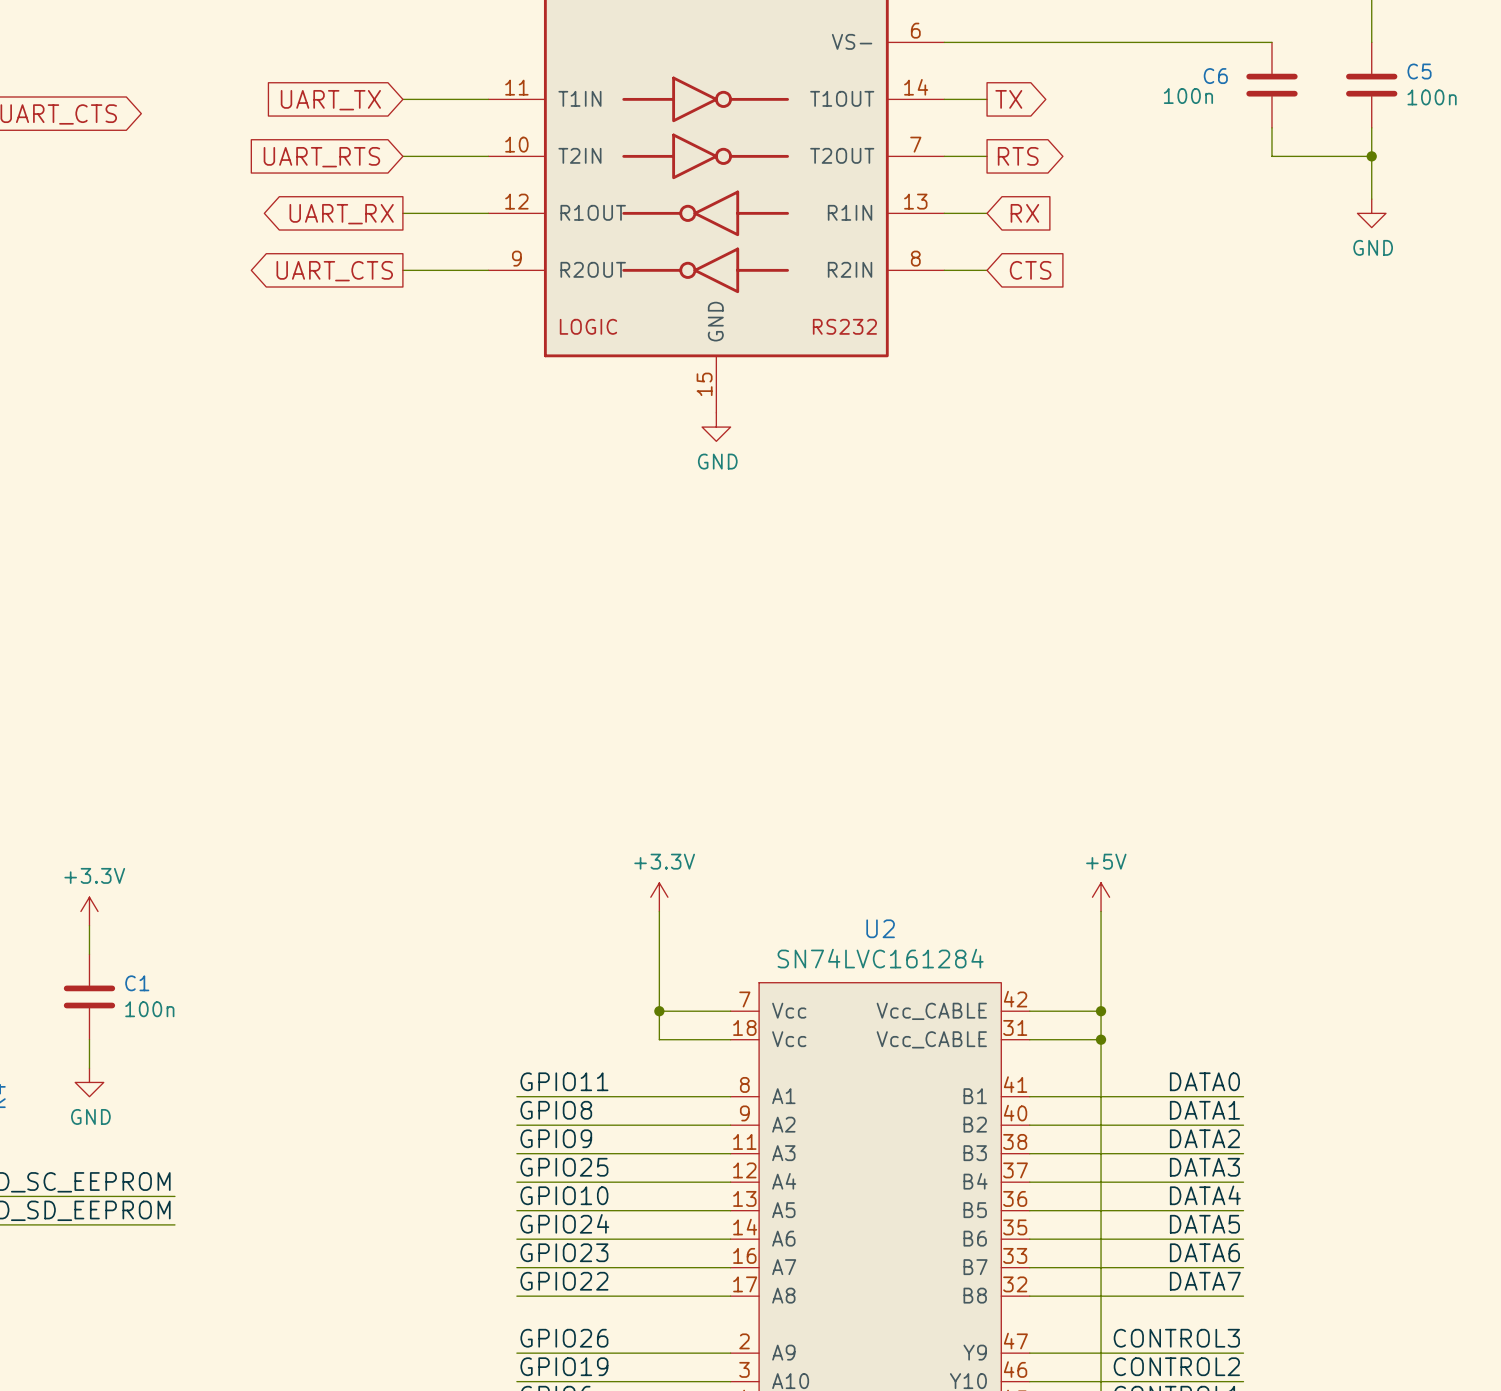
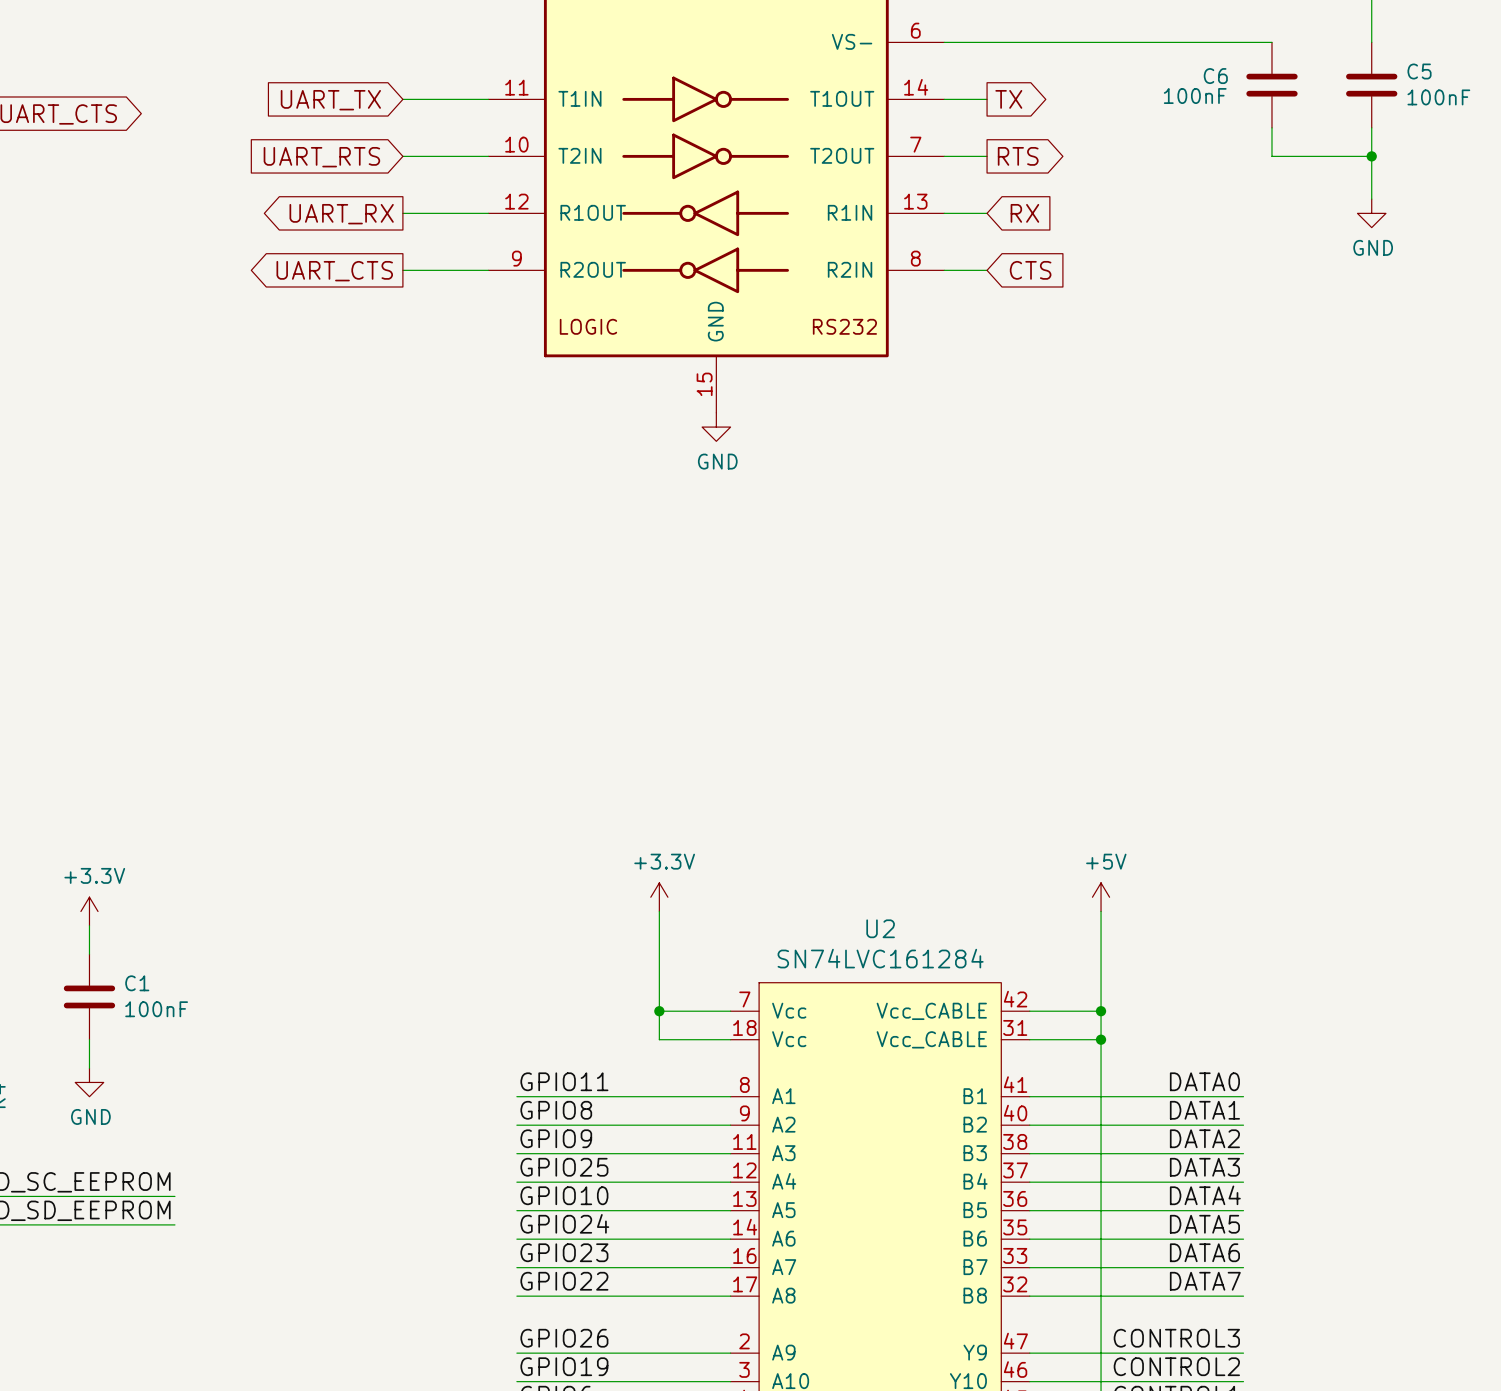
C6 value: 100n (1188, 96) -> 100nF (1195, 96)
C5 value: 100n (1432, 97) -> 100nF (1438, 97)
C1 value: 100n (149, 1009) -> 100nF (156, 1009)

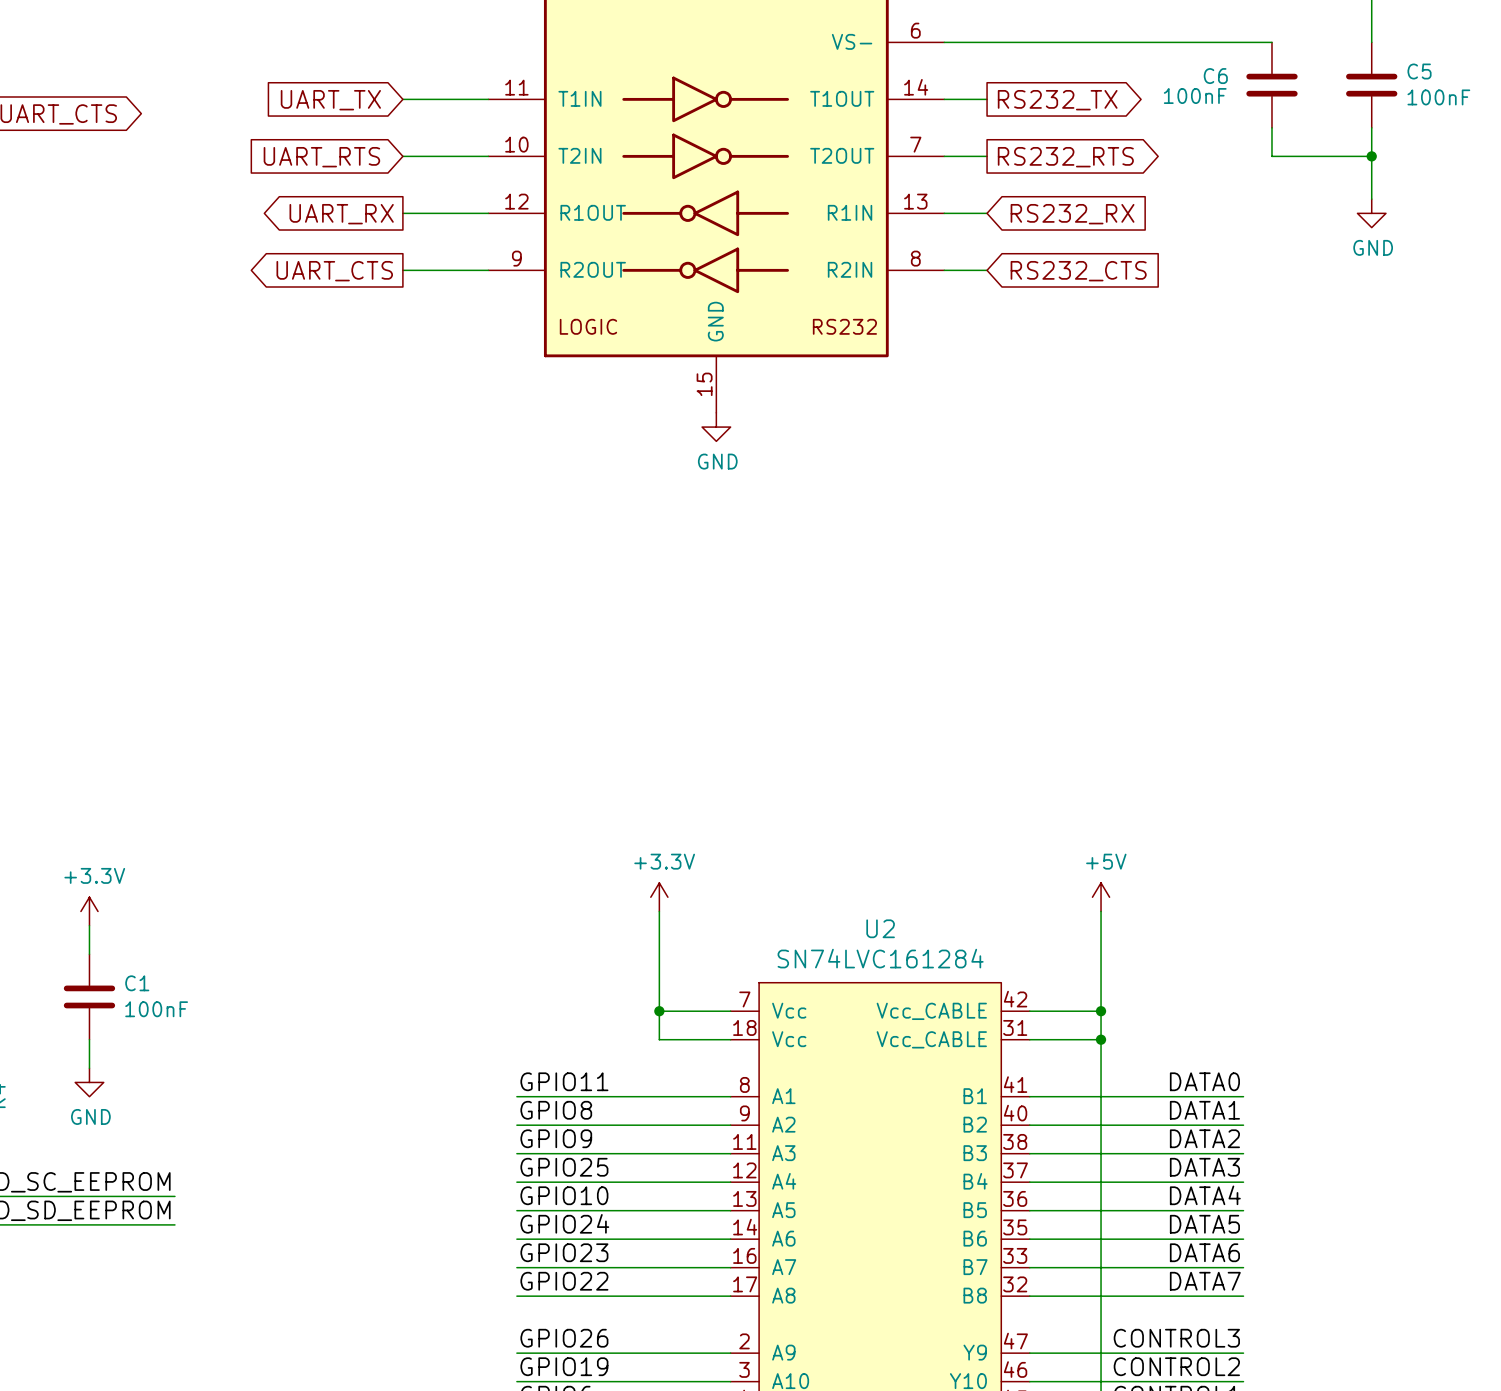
global label: TX (1008, 99) -> RS232_TX (1057, 100)
global label: RTS (1018, 156) -> RS232_RTS (1065, 157)
global label: RX (1024, 213) -> RS232_RX (1072, 214)
global label: CTS (1030, 270) -> RS232_CTS (1078, 271)

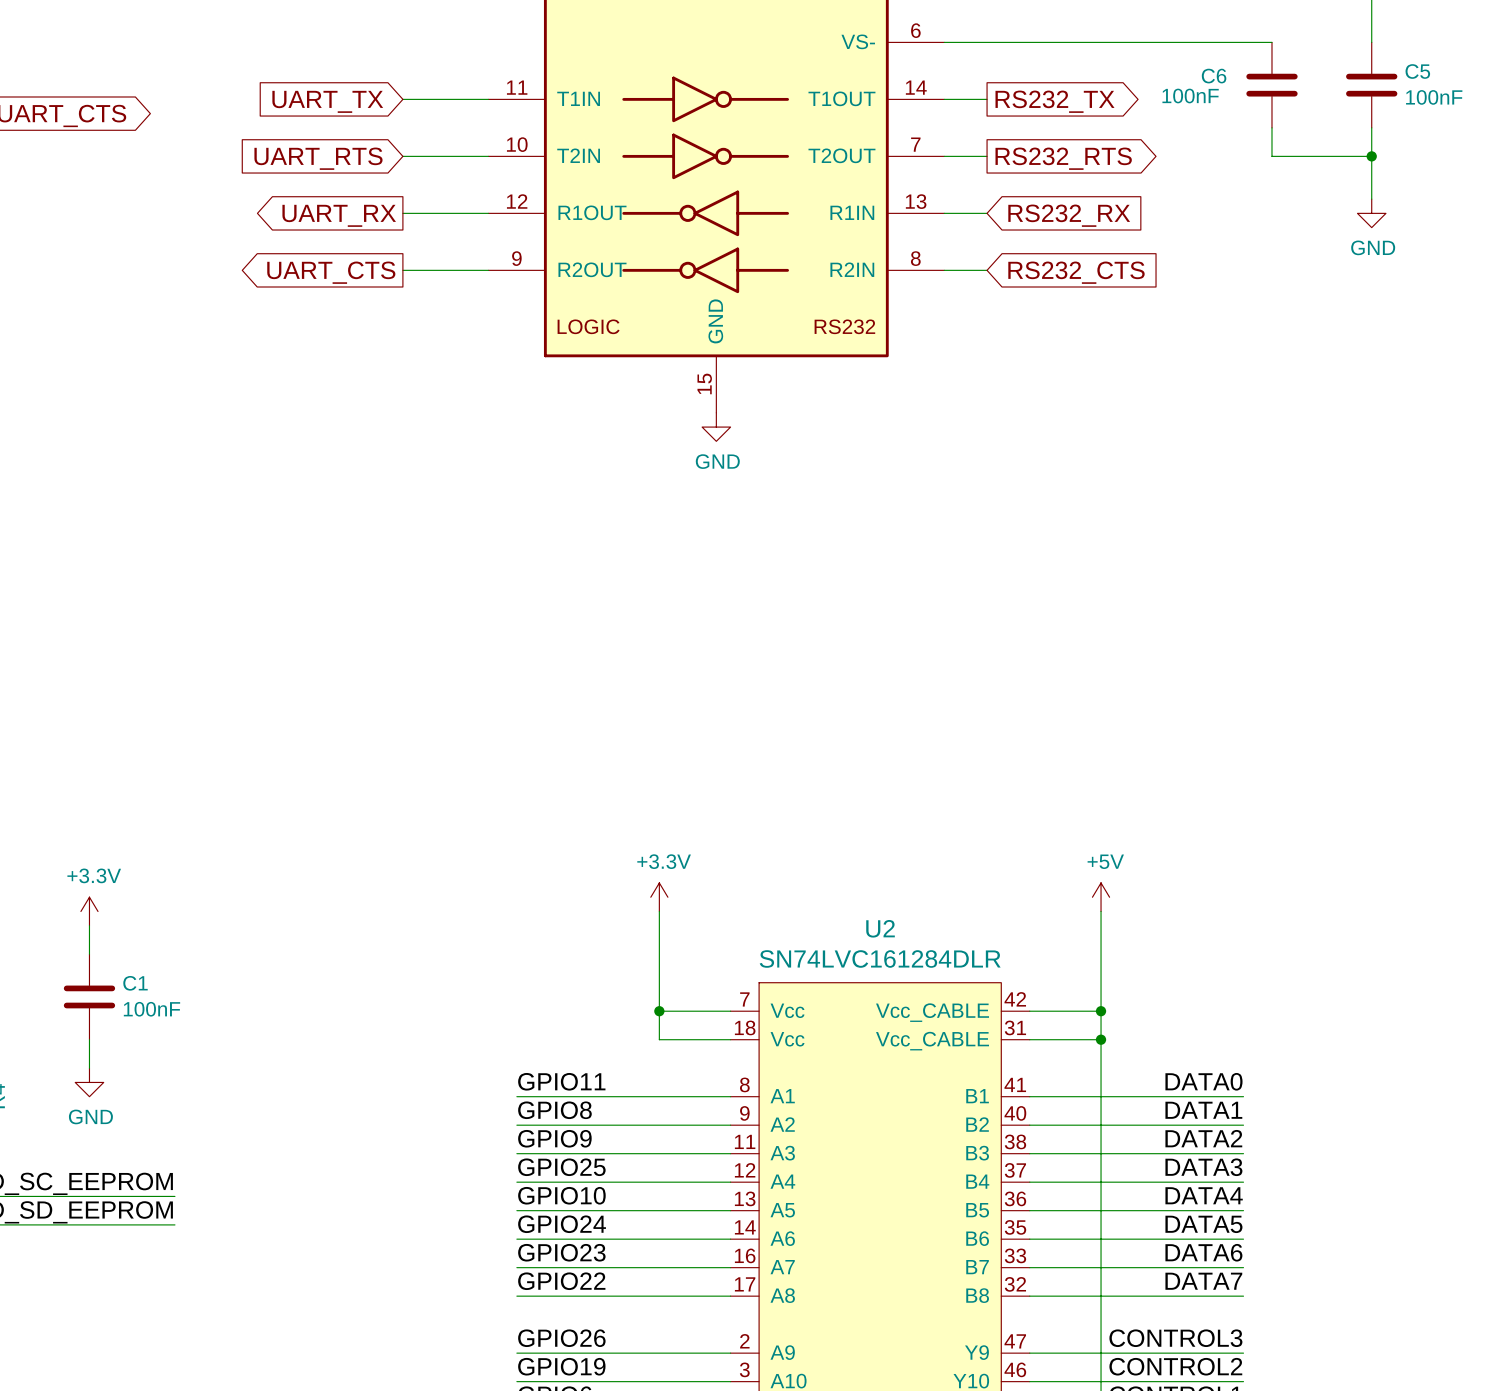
U2 value: SN74LVC161284 (880, 958) -> SN74LVC161284DLR (880, 958)

